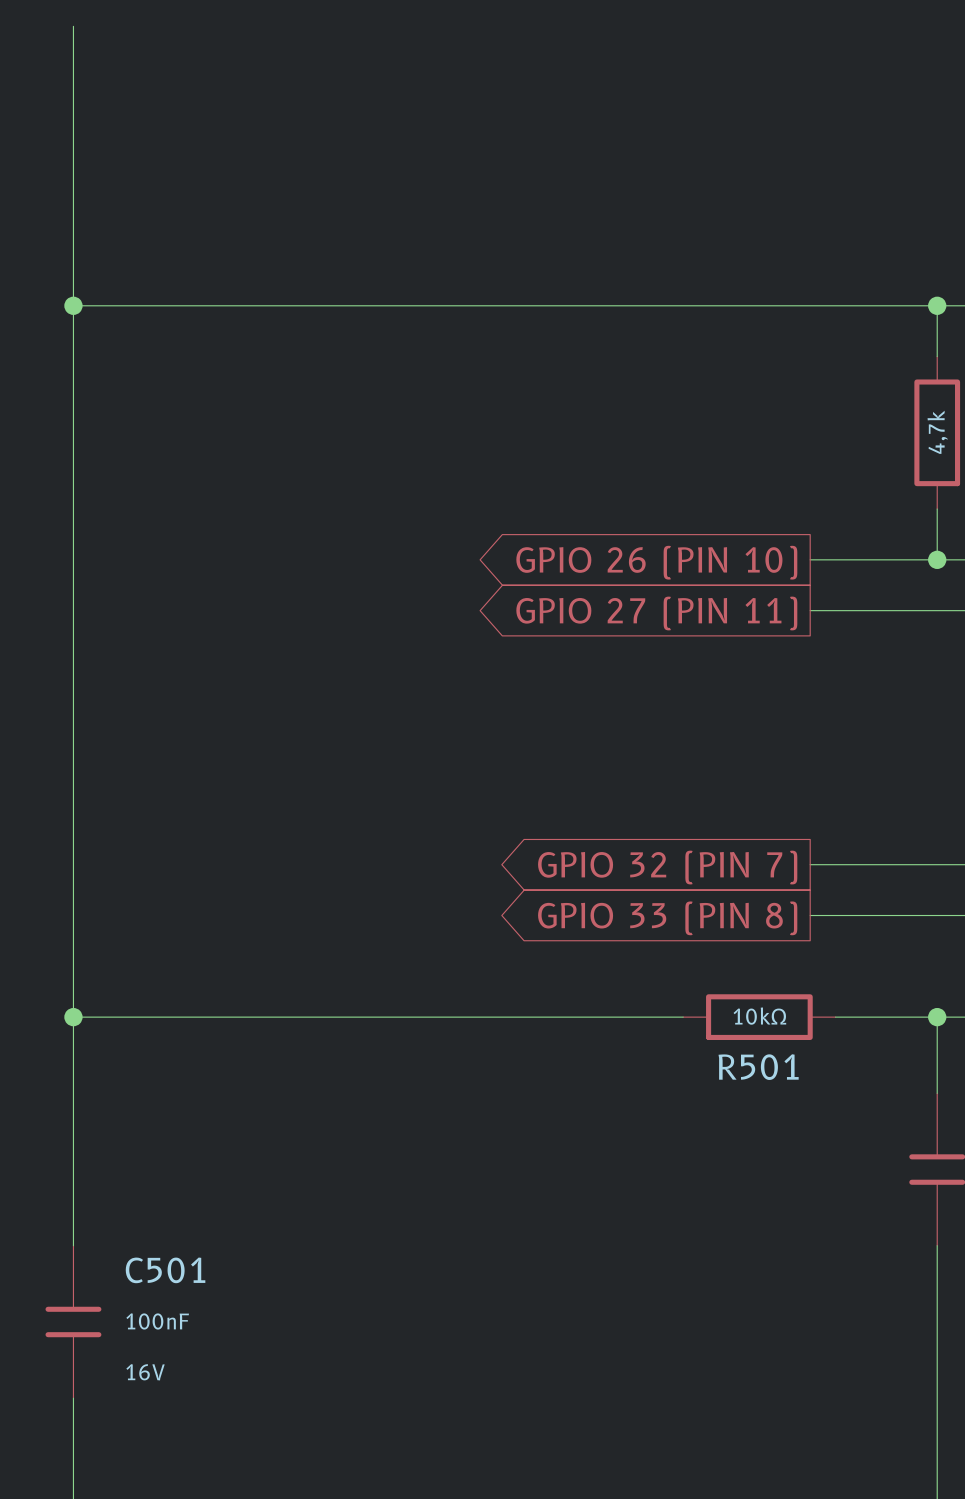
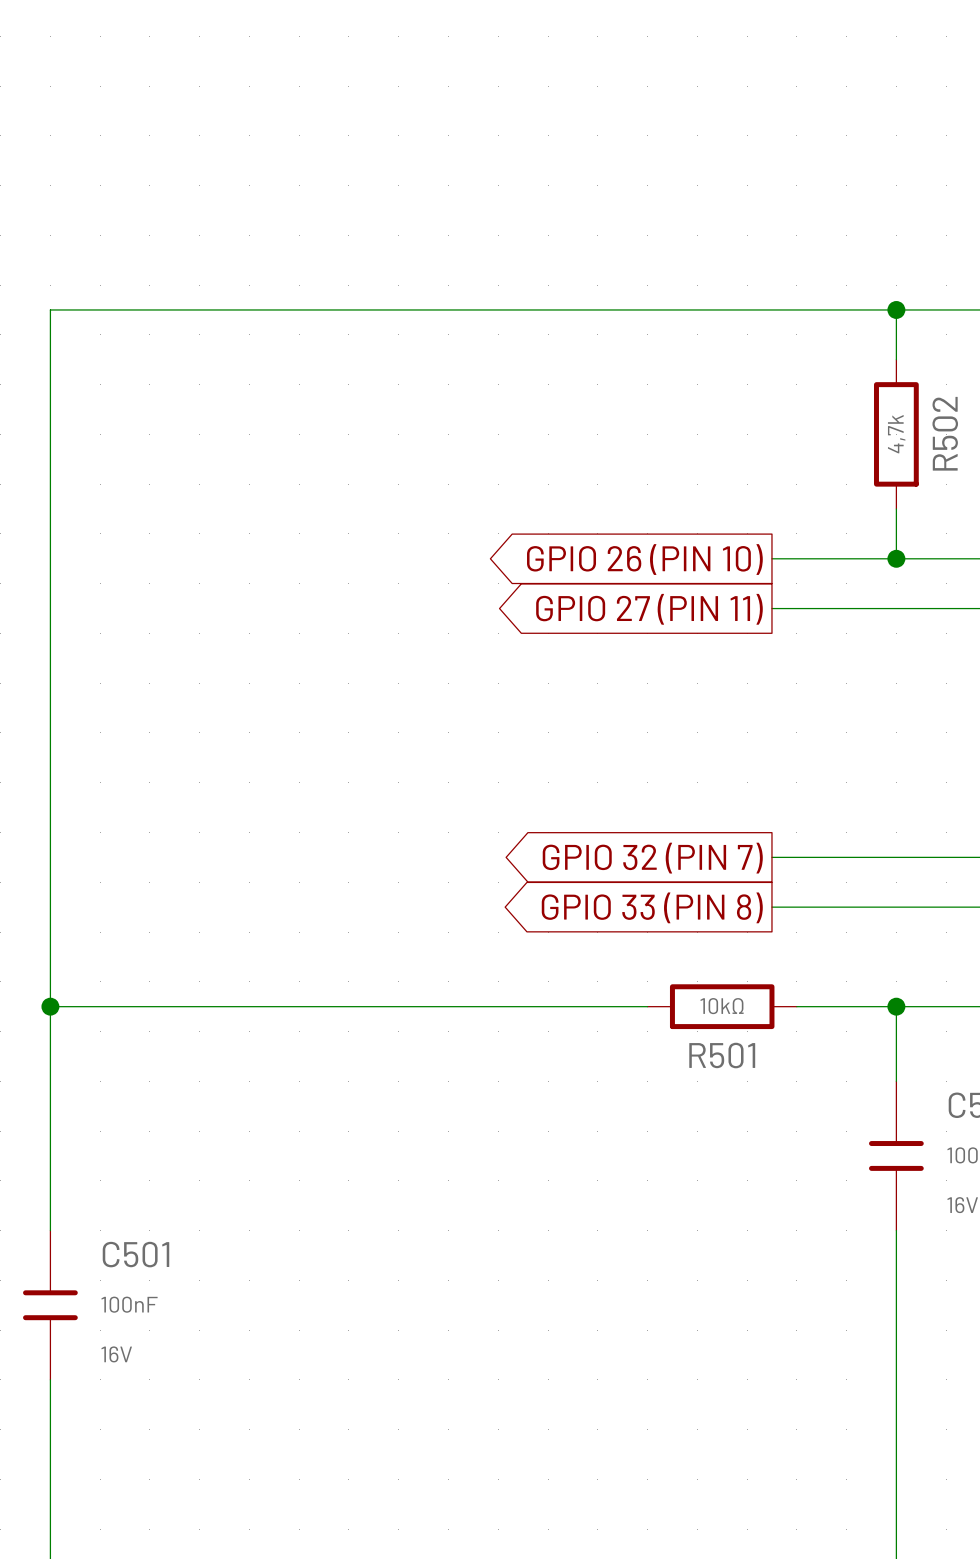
wire: (73, 26) (73, 305) -> none
junction: (73, 305) -> none

